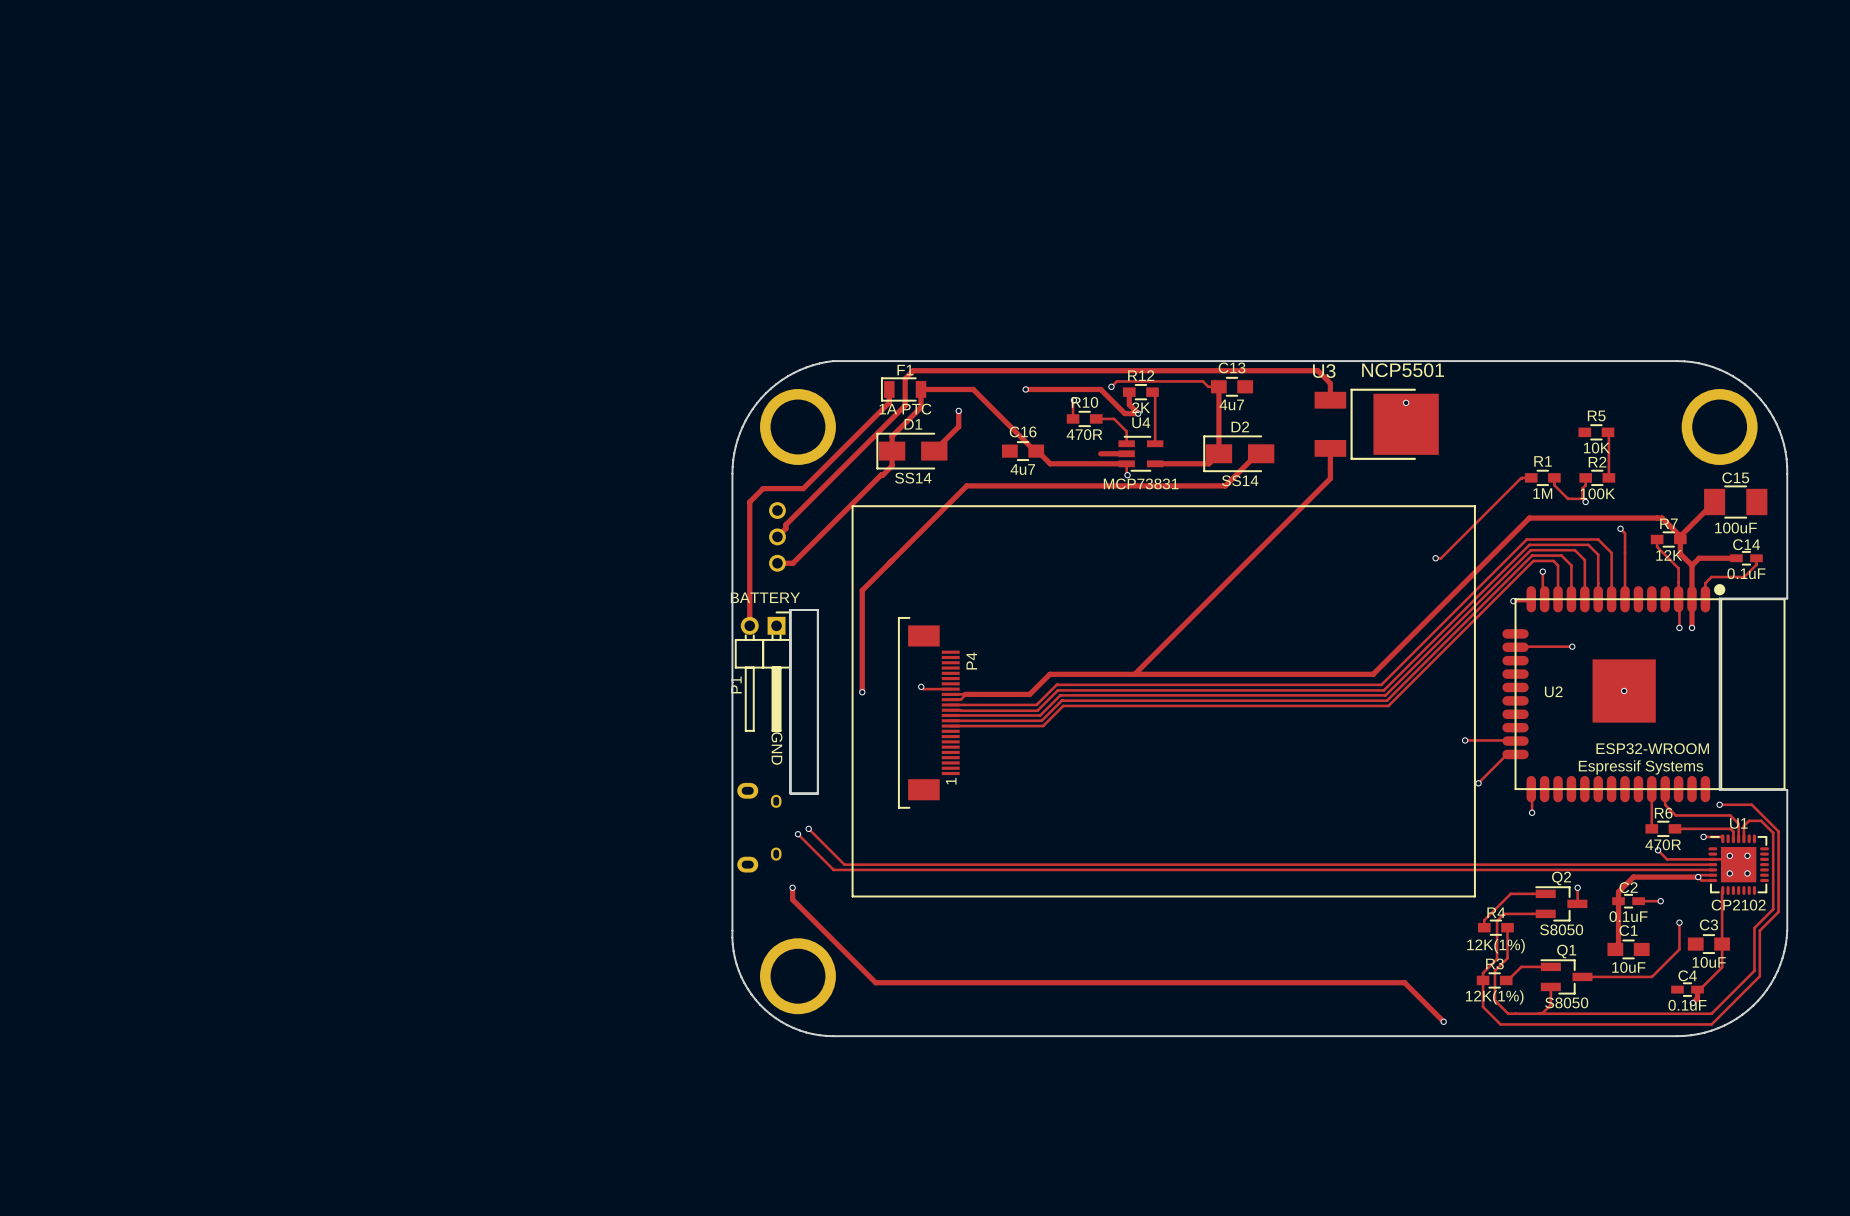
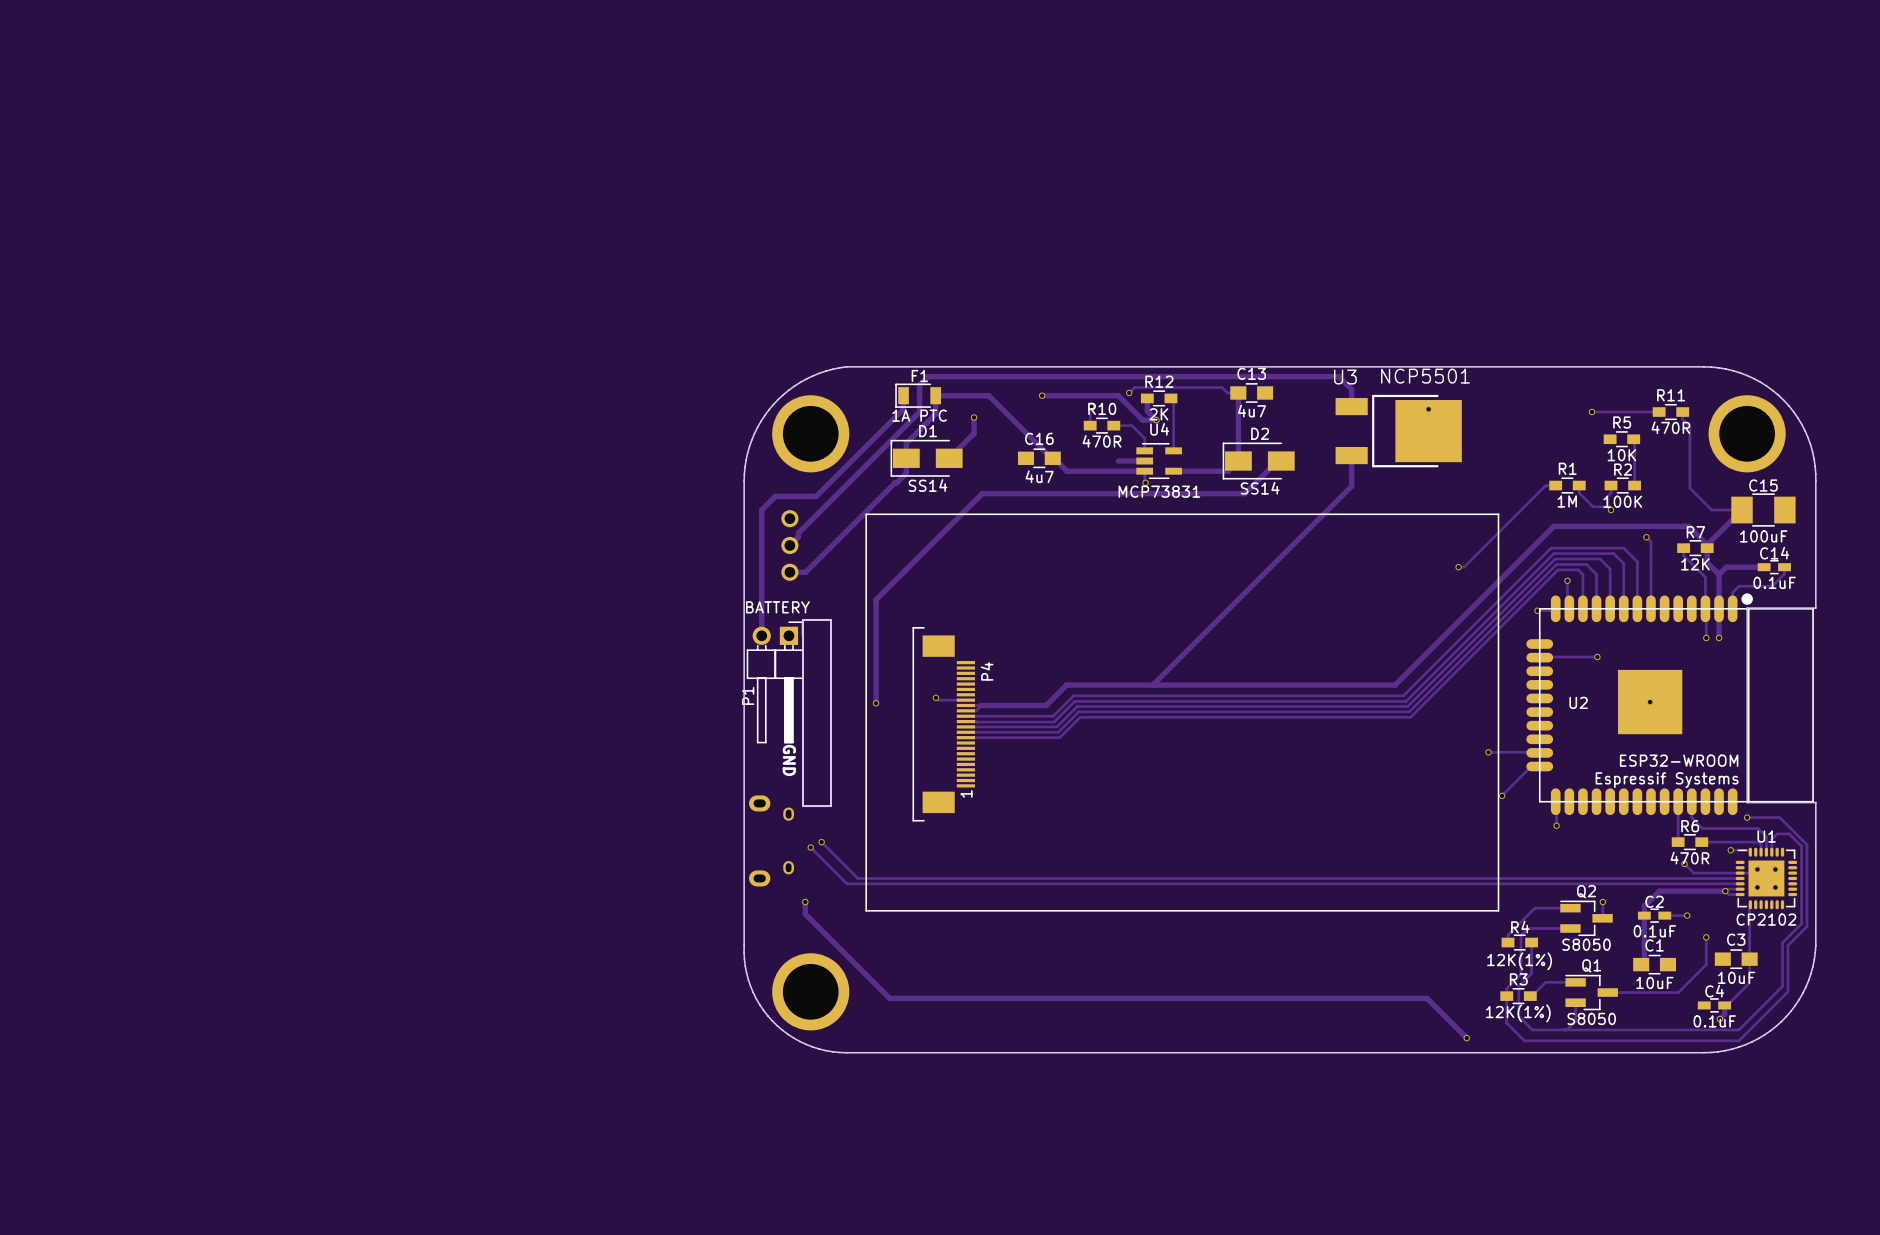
track: none -> (1591, 412) (1659, 412)
via: none -> (1591, 412)
R11: none -> 470R (1670, 412)
track: none -> (1682, 412) (1682, 419) (1689, 426) (1689, 488) (1711, 510) (1742, 510)

